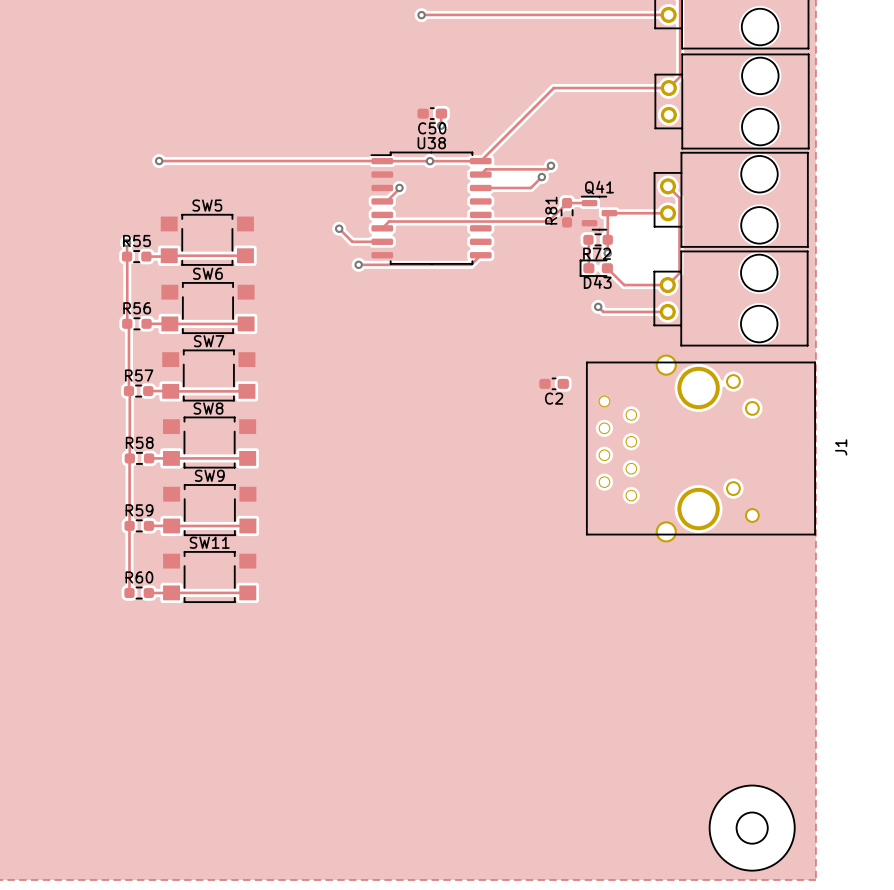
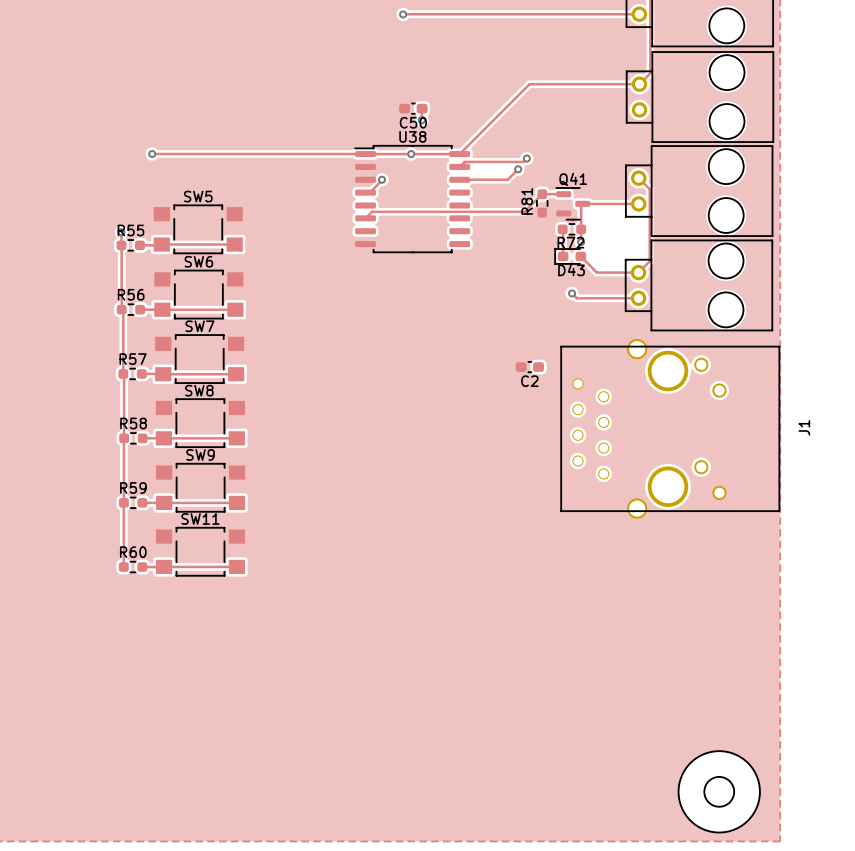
track: (339, 228) (352, 241) (382, 241) -> none
via: (339, 228) -> none
track: (480, 255) (471, 264) (358, 264) -> none
via: (358, 264) -> none

